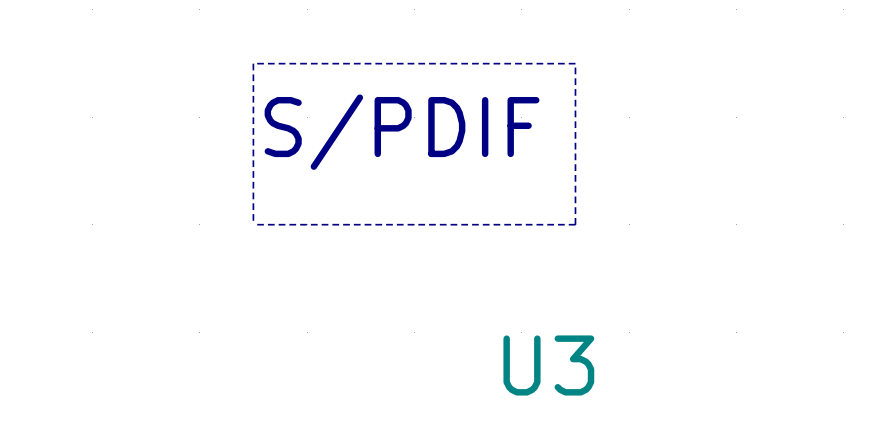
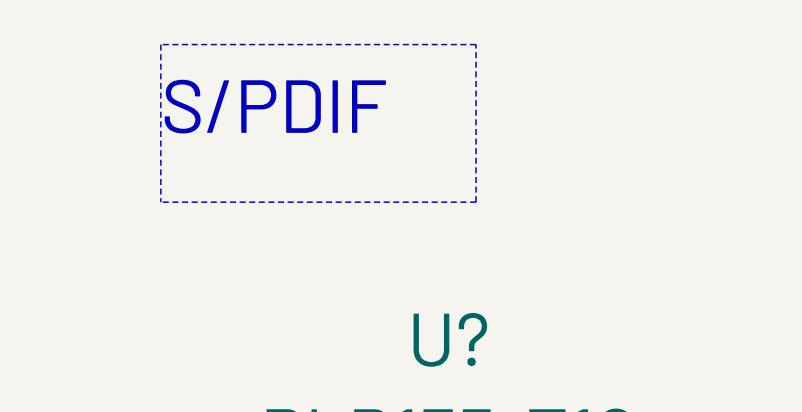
U3 name: U3 (548, 365) -> U? (450, 339)

